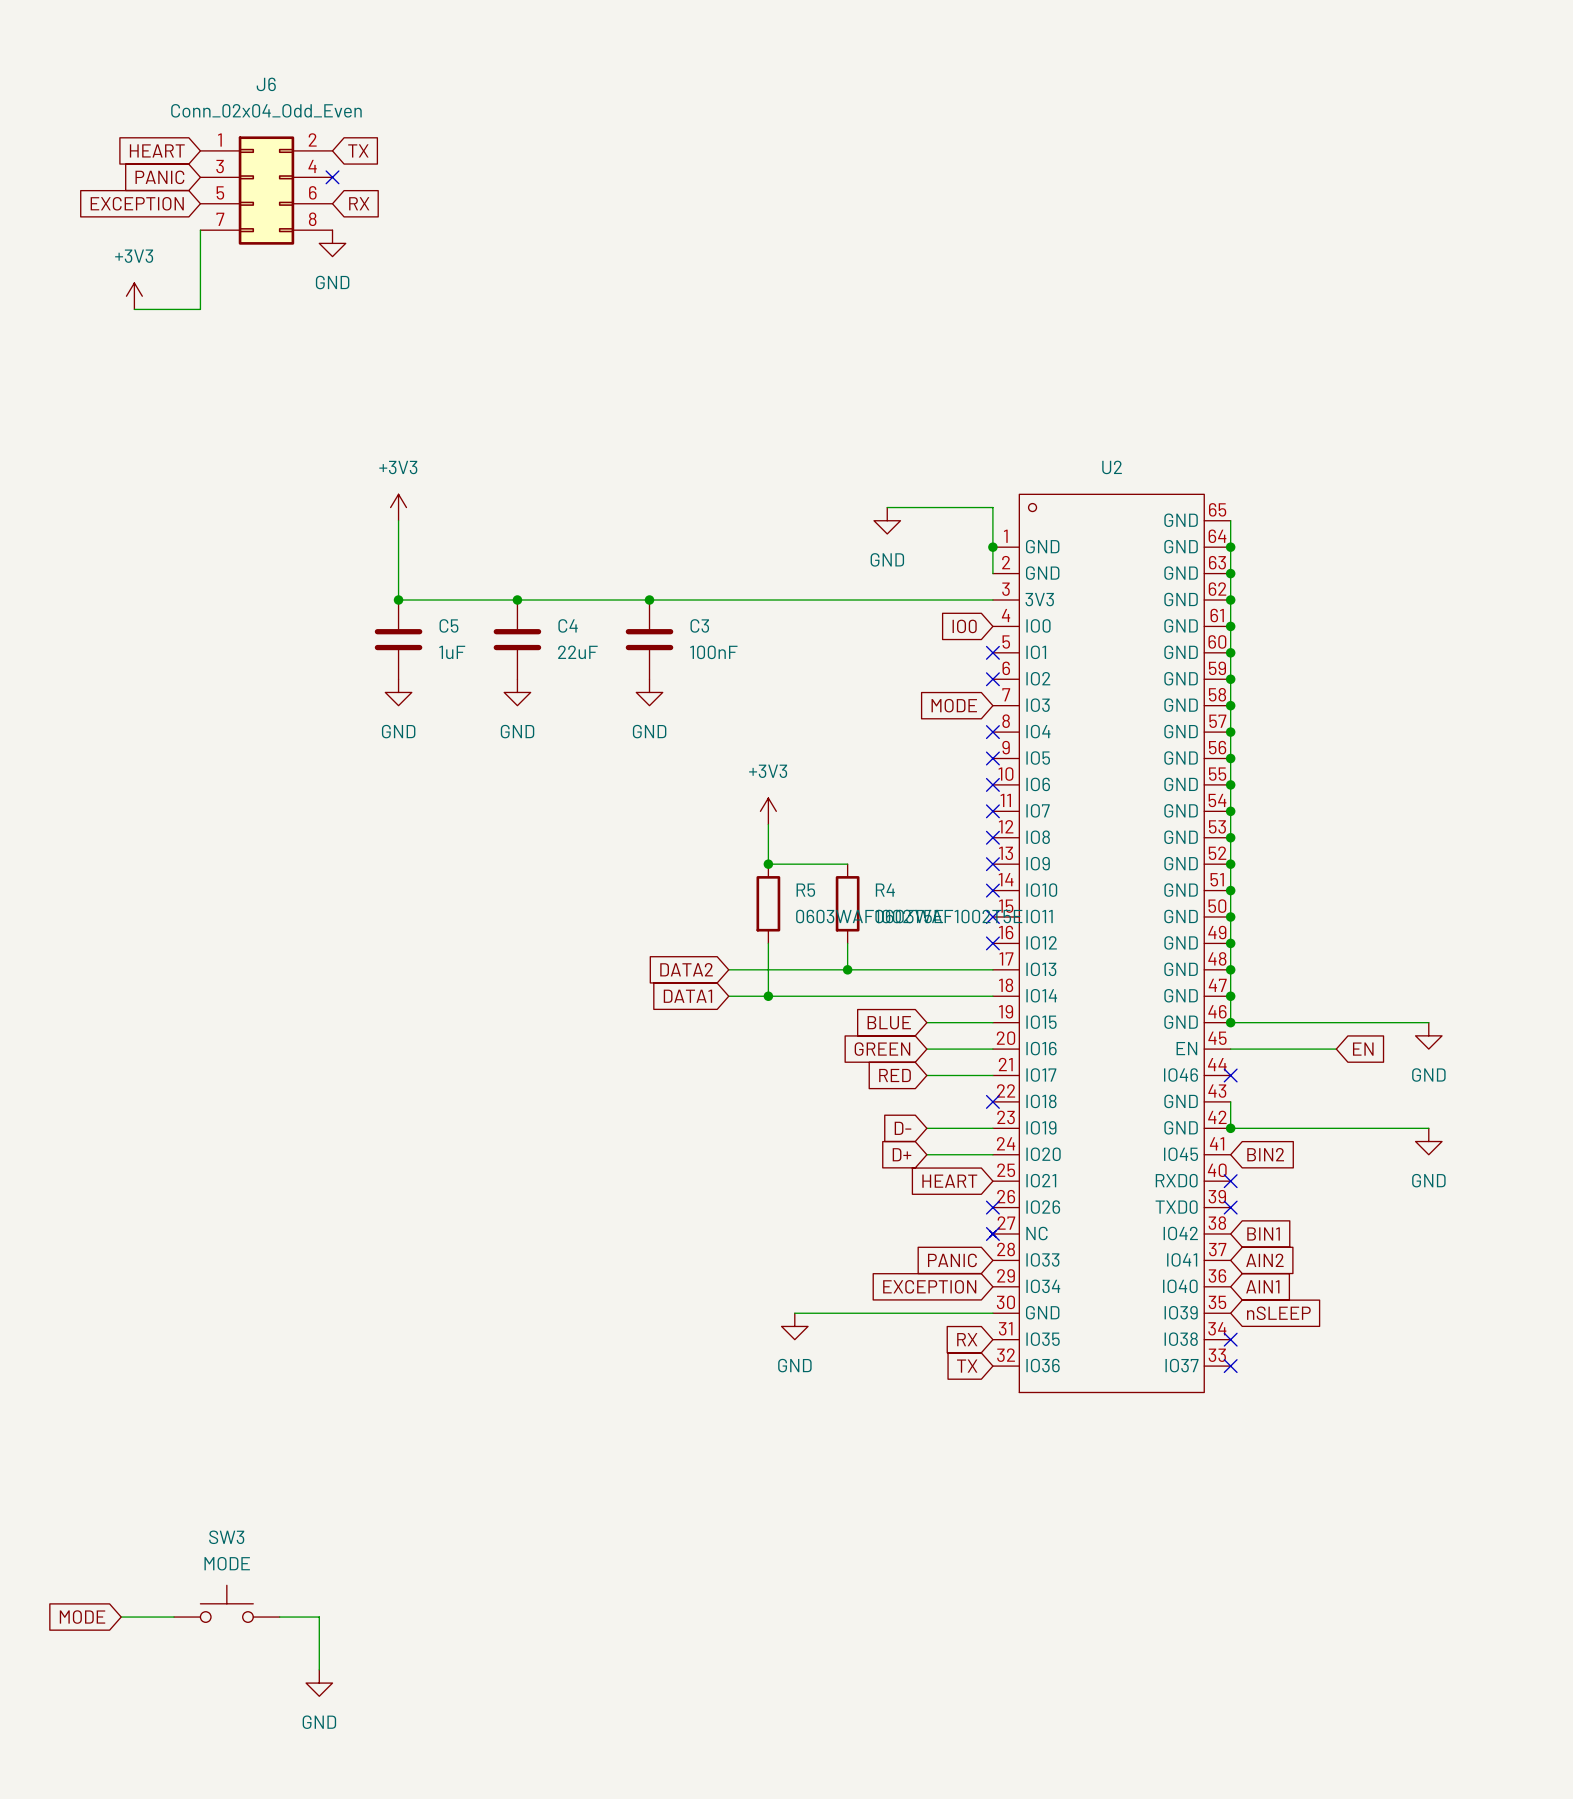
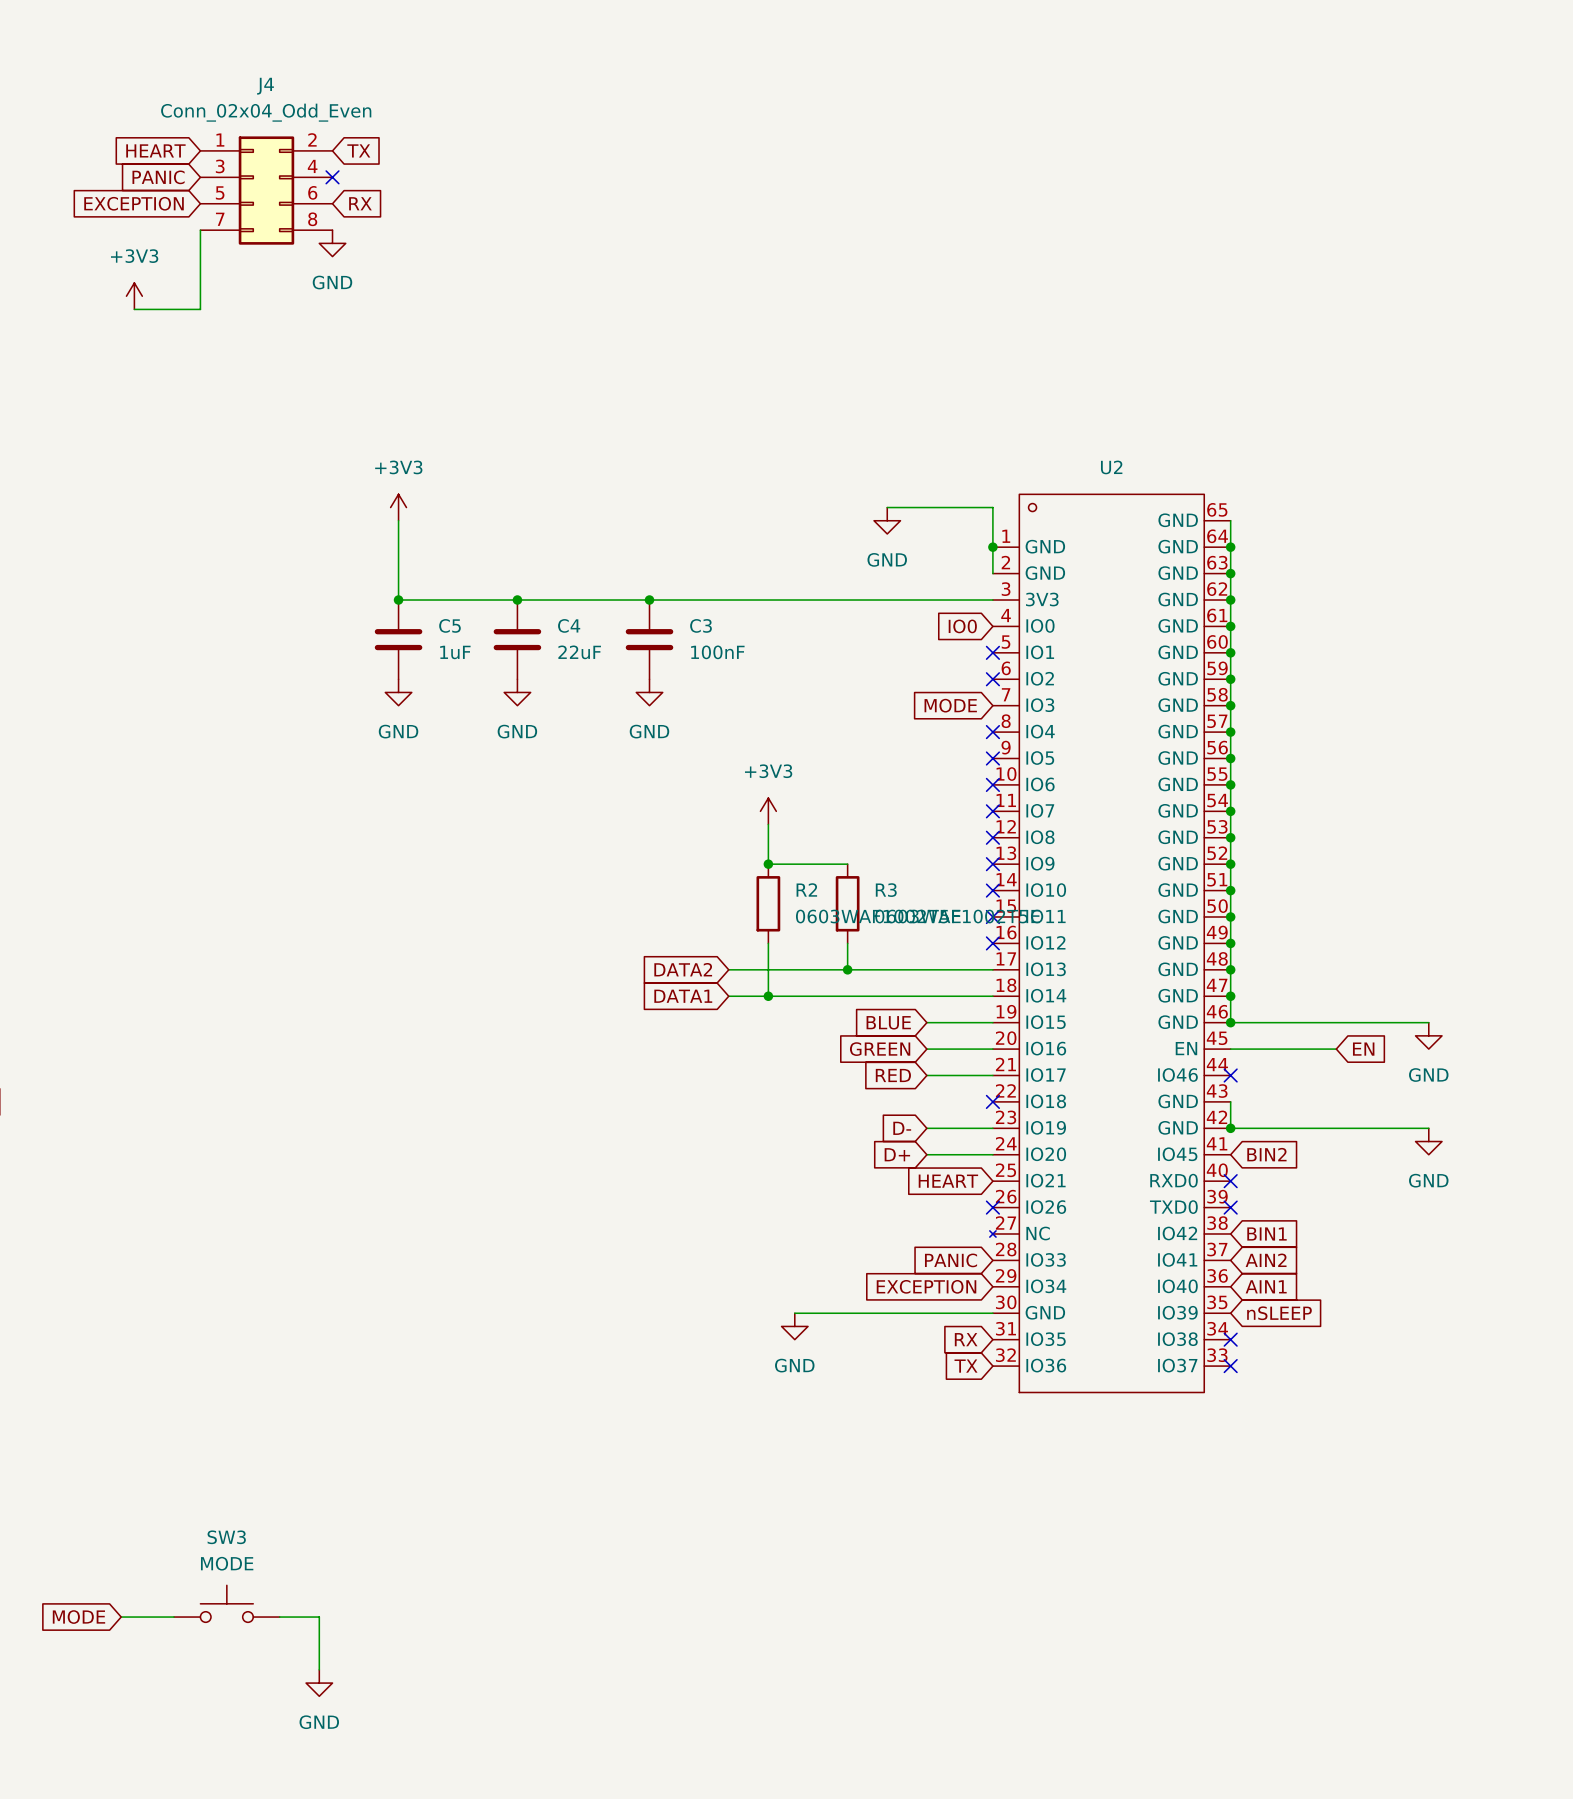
J6 name: J6 (266, 84) -> J4 (265, 86)
R5 name: R5 (805, 890) -> R2 (806, 889)
R4 name: R4 (885, 890) -> R3 (886, 890)
no-connect mark: (992, 1233) -> none

